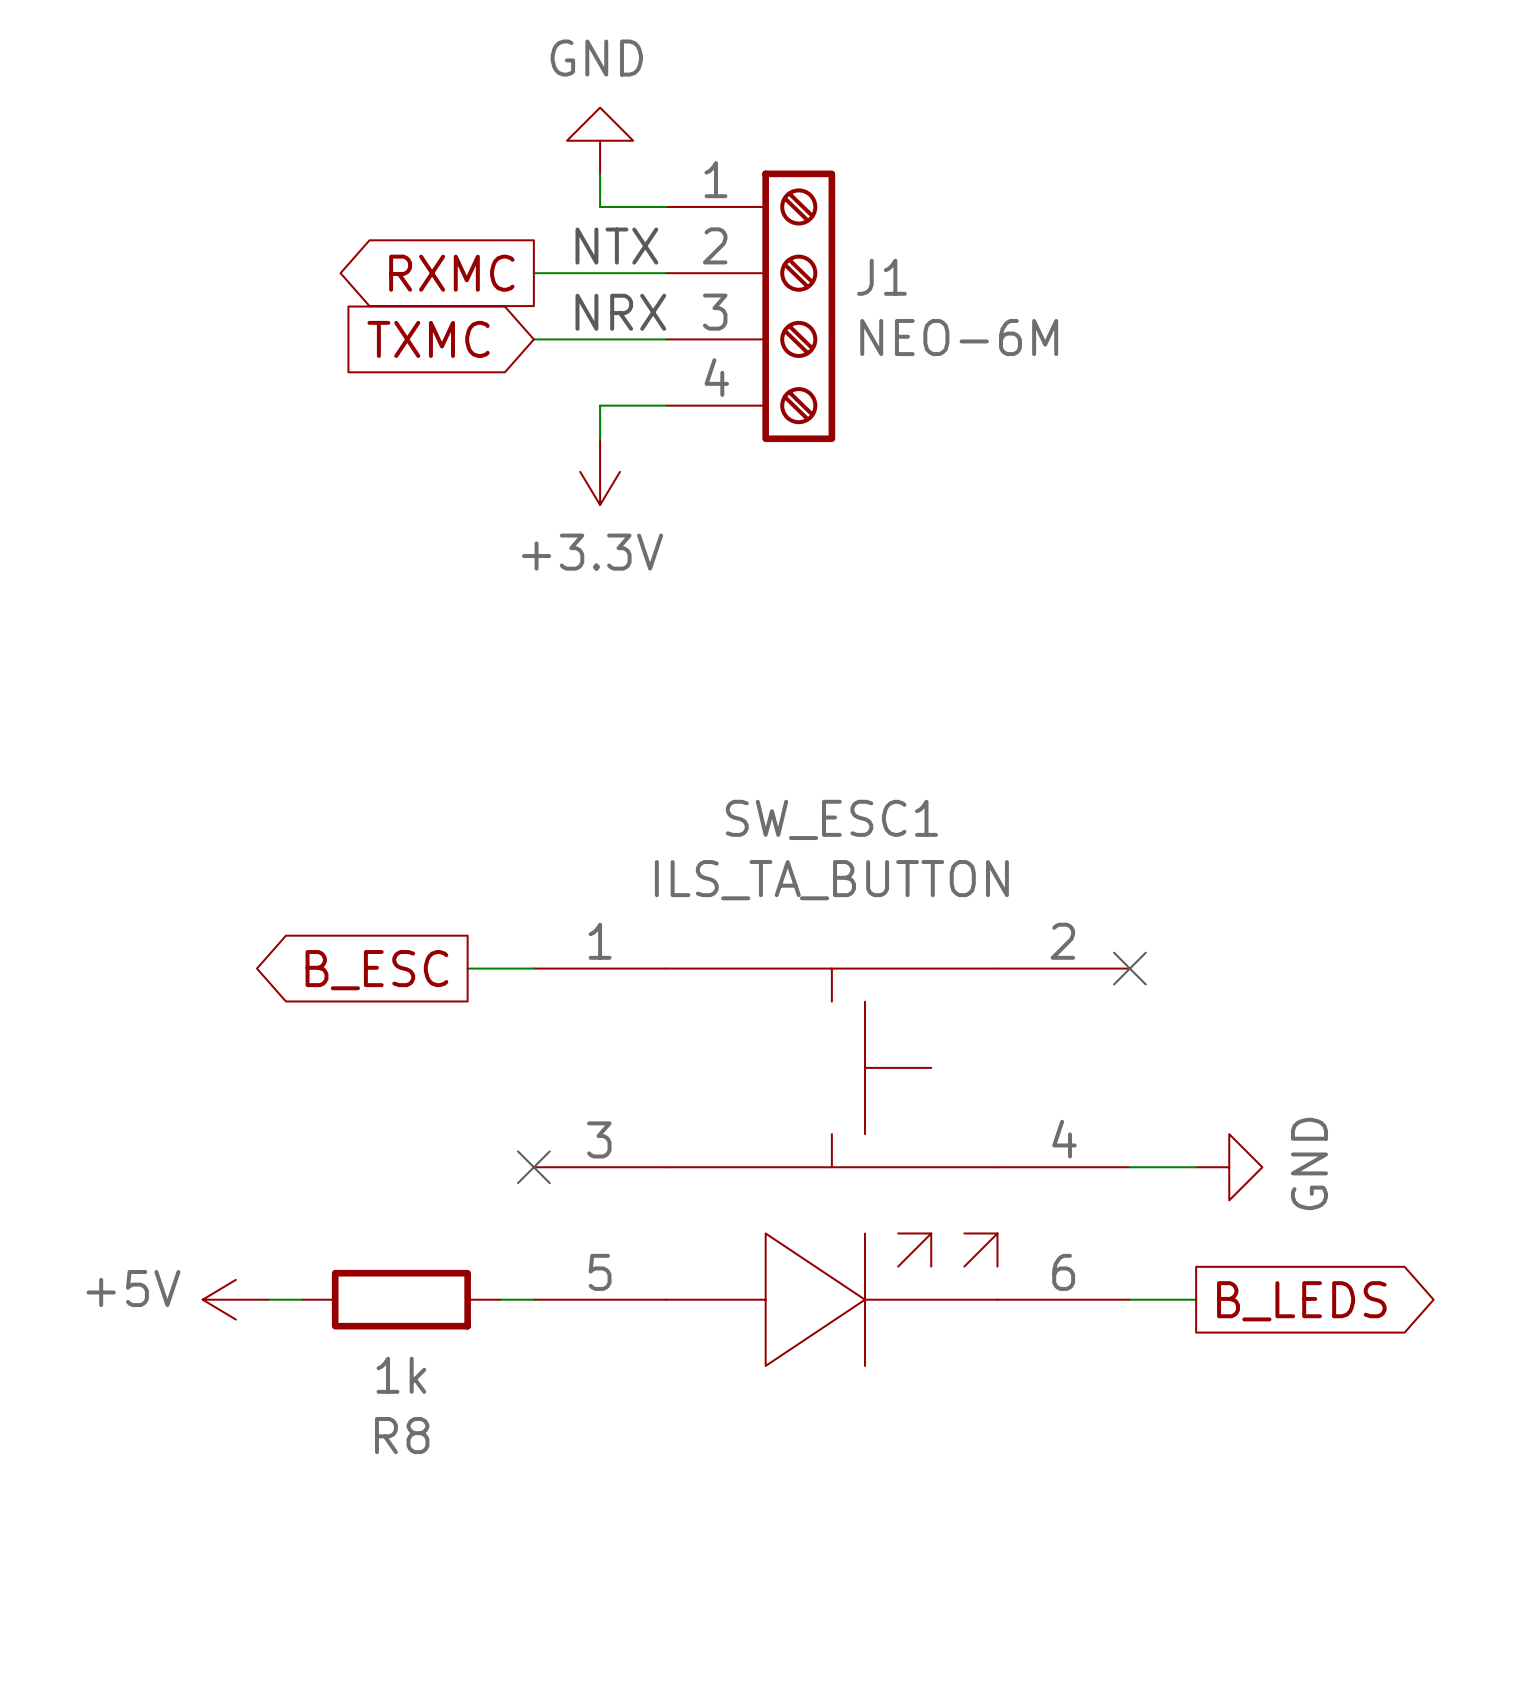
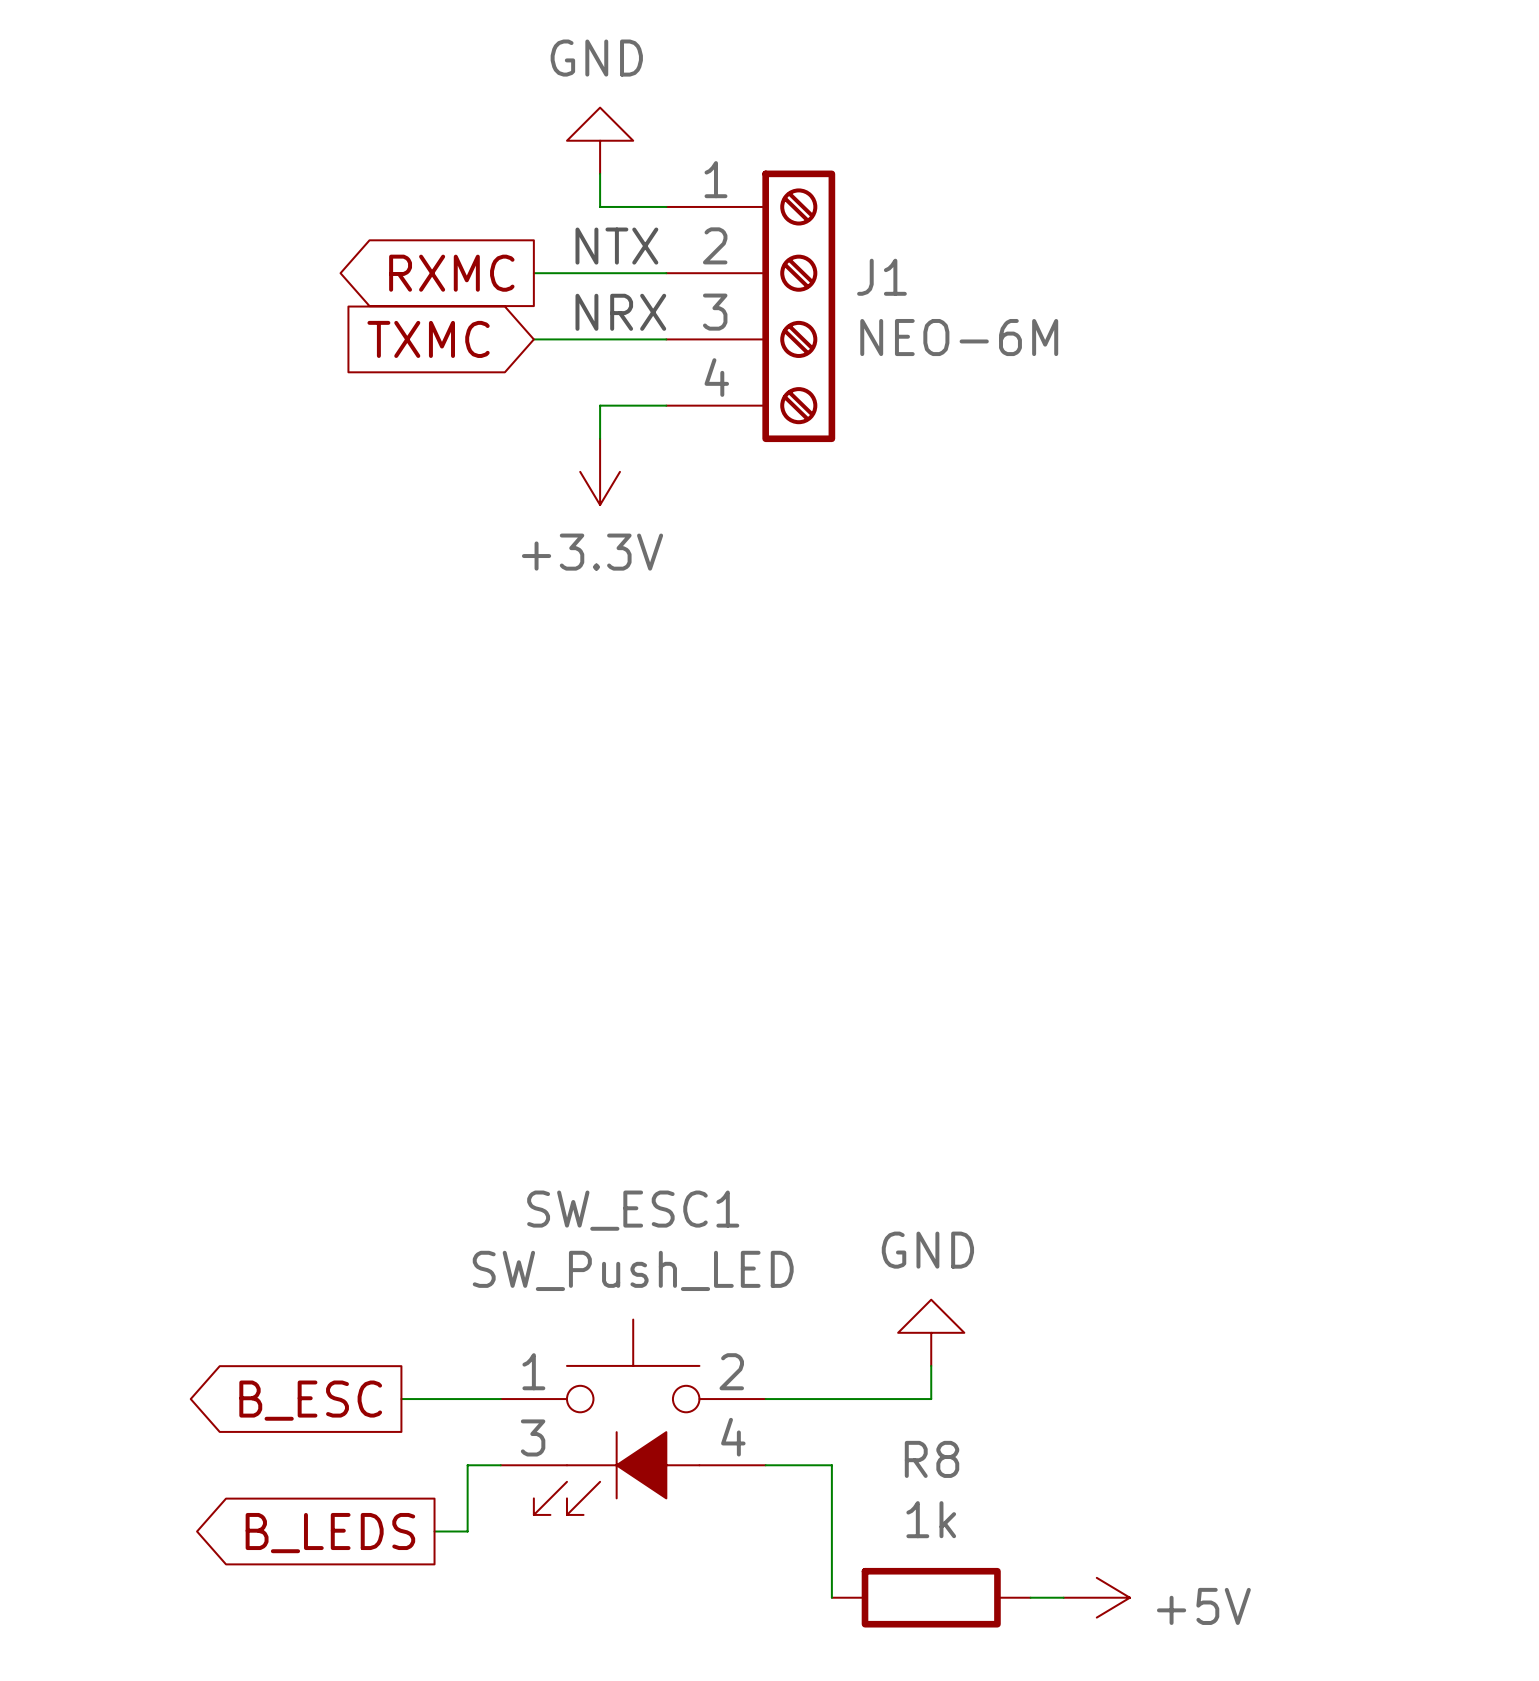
SW_ESC1 name position: SW_ESC1 (831, 819) -> SW_ESC1 (633, 1210)
SW_ESC1 value: ILS_TA_BUTTON (831, 880) -> SW_Push_LED (633, 1270)
wire: (467, 968) (533, 968) -> none
SW_ESC1 symbol: [533, 968, 1130, 1366] -> [500, 1319, 766, 1515]
no-connect mark: (1129, 968) -> none
global label position: B_ESC (376, 970) -> B_ESC (310, 1400)
no-connect mark: (533, 1167) -> none
wire: (1129, 1167) (1196, 1167) -> none
power symbol rotation: 0° (1229, 1167) -> 90° counterclockwise (931, 1332)
power symbol position: GND (1229, 1167) -> GND (931, 1332)
power symbol: +5V (235, 1299) -> none
wire: (268, 1299) (302, 1299) -> none
R8 position: (401, 1299) -> (931, 1597)
wire: (500, 1299) (533, 1299) -> (1030, 1597) (1063, 1597)
wire: (1129, 1299) (1196, 1299) -> none
global label: B_LEDS (1301, 1301) -> none
wire: none -> (931, 1365) (931, 1399) (765, 1399)
R8 value position: 1k (401, 1375) -> 1k (931, 1519)
wire: none -> (401, 1399) (500, 1399)
R8 name position: R8 (402, 1435) -> R8 (932, 1459)
wire: none -> (500, 1465) (467, 1465) (467, 1531) (434, 1531)
wire: none -> (765, 1465) (831, 1465) (831, 1597)
global label: none -> B_LEDS (330, 1533)
power symbol: none -> +5V (1096, 1597)

